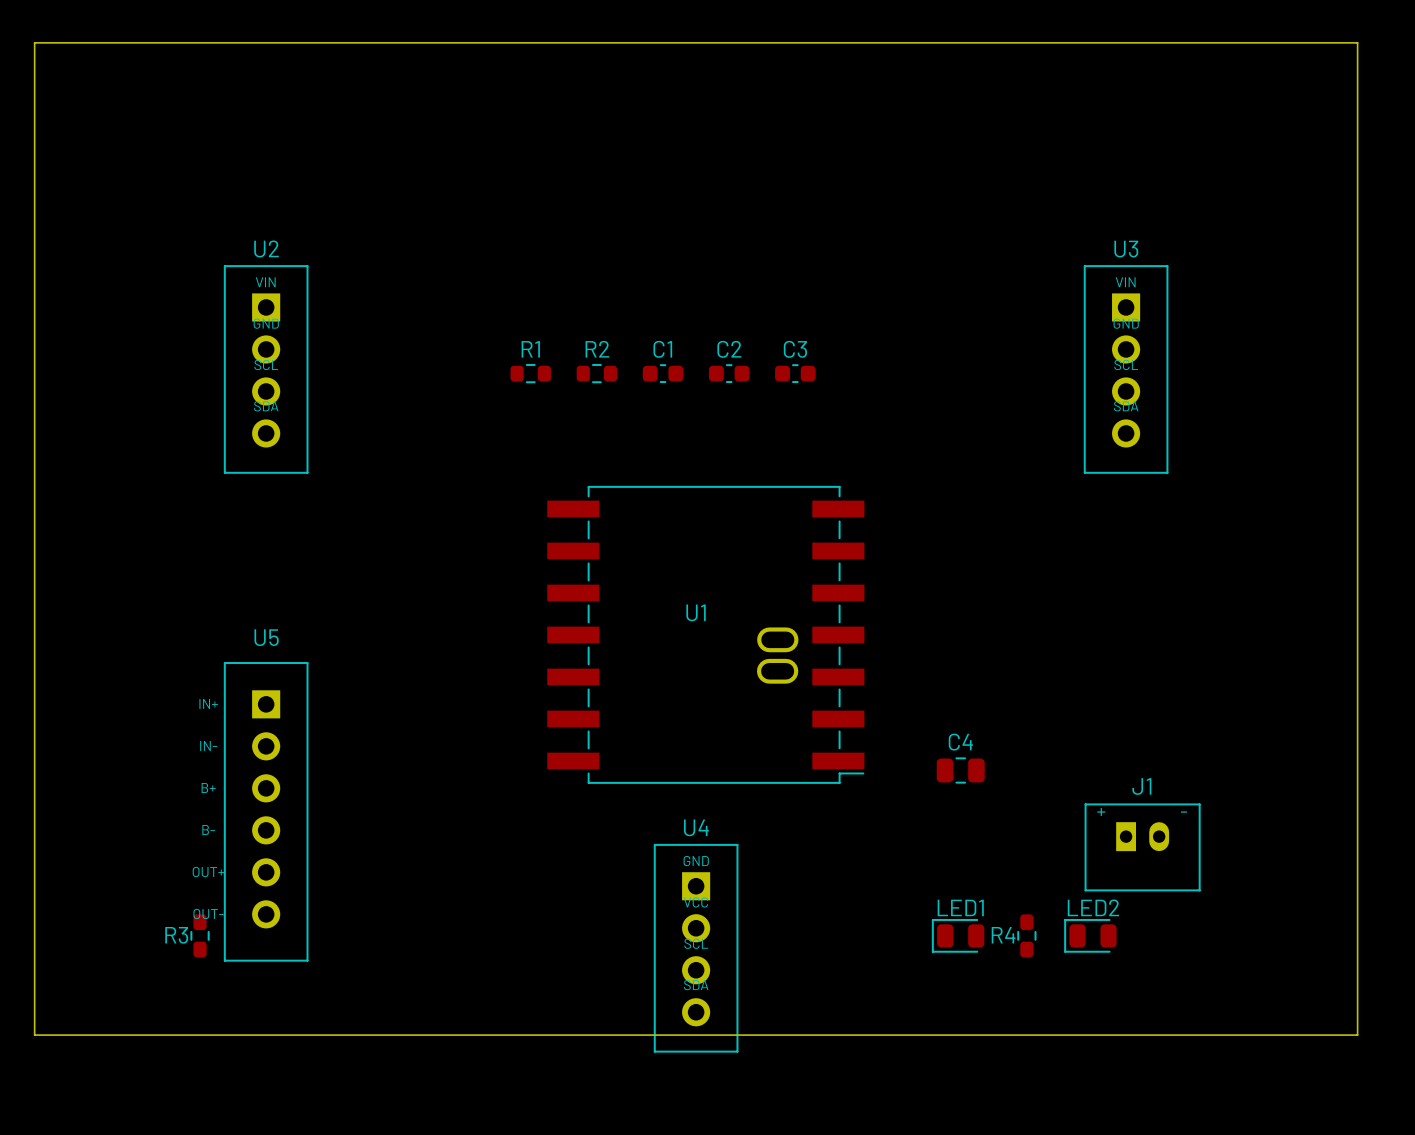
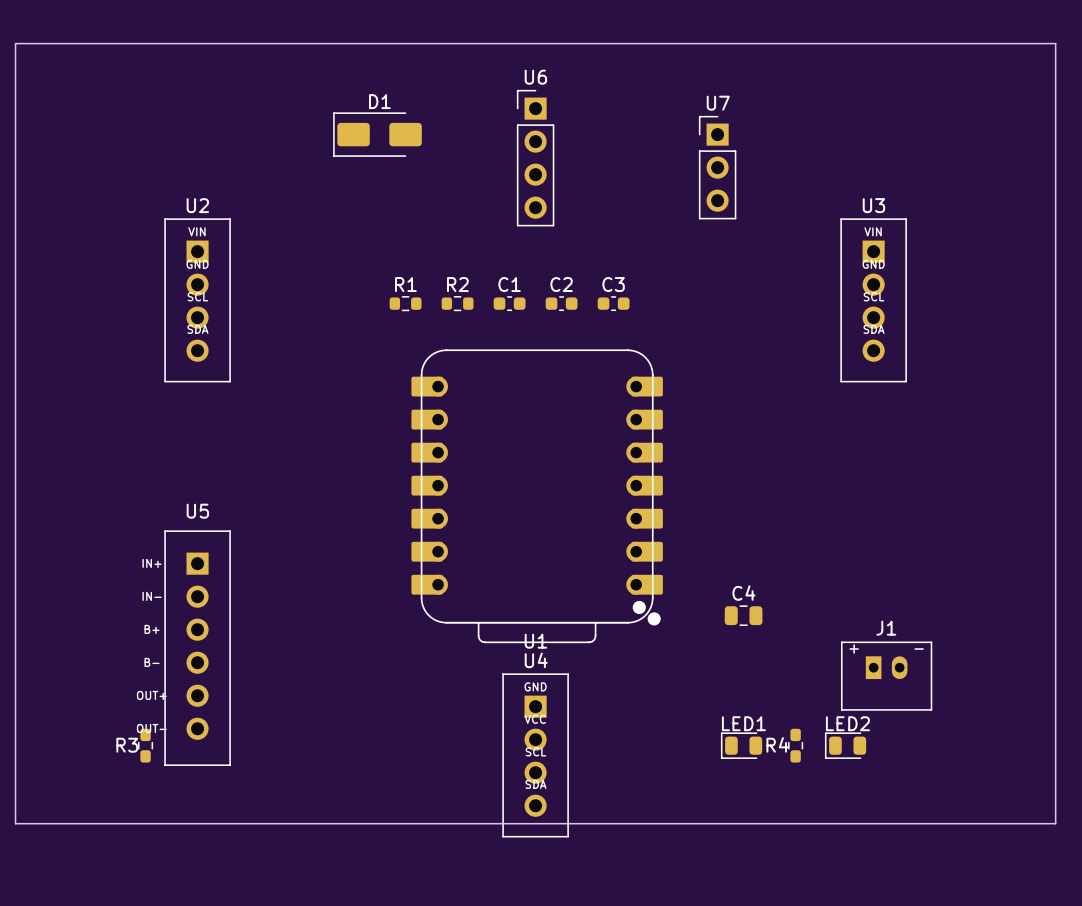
D1: none -> (377, 134)
U6: none -> (535, 158)
U7: none -> (717, 167)
U1 footprint: [547, 485, 865, 784] -> [411, 349, 663, 644]
U1 name position: U1 (696, 612) -> U1 (535, 641)

